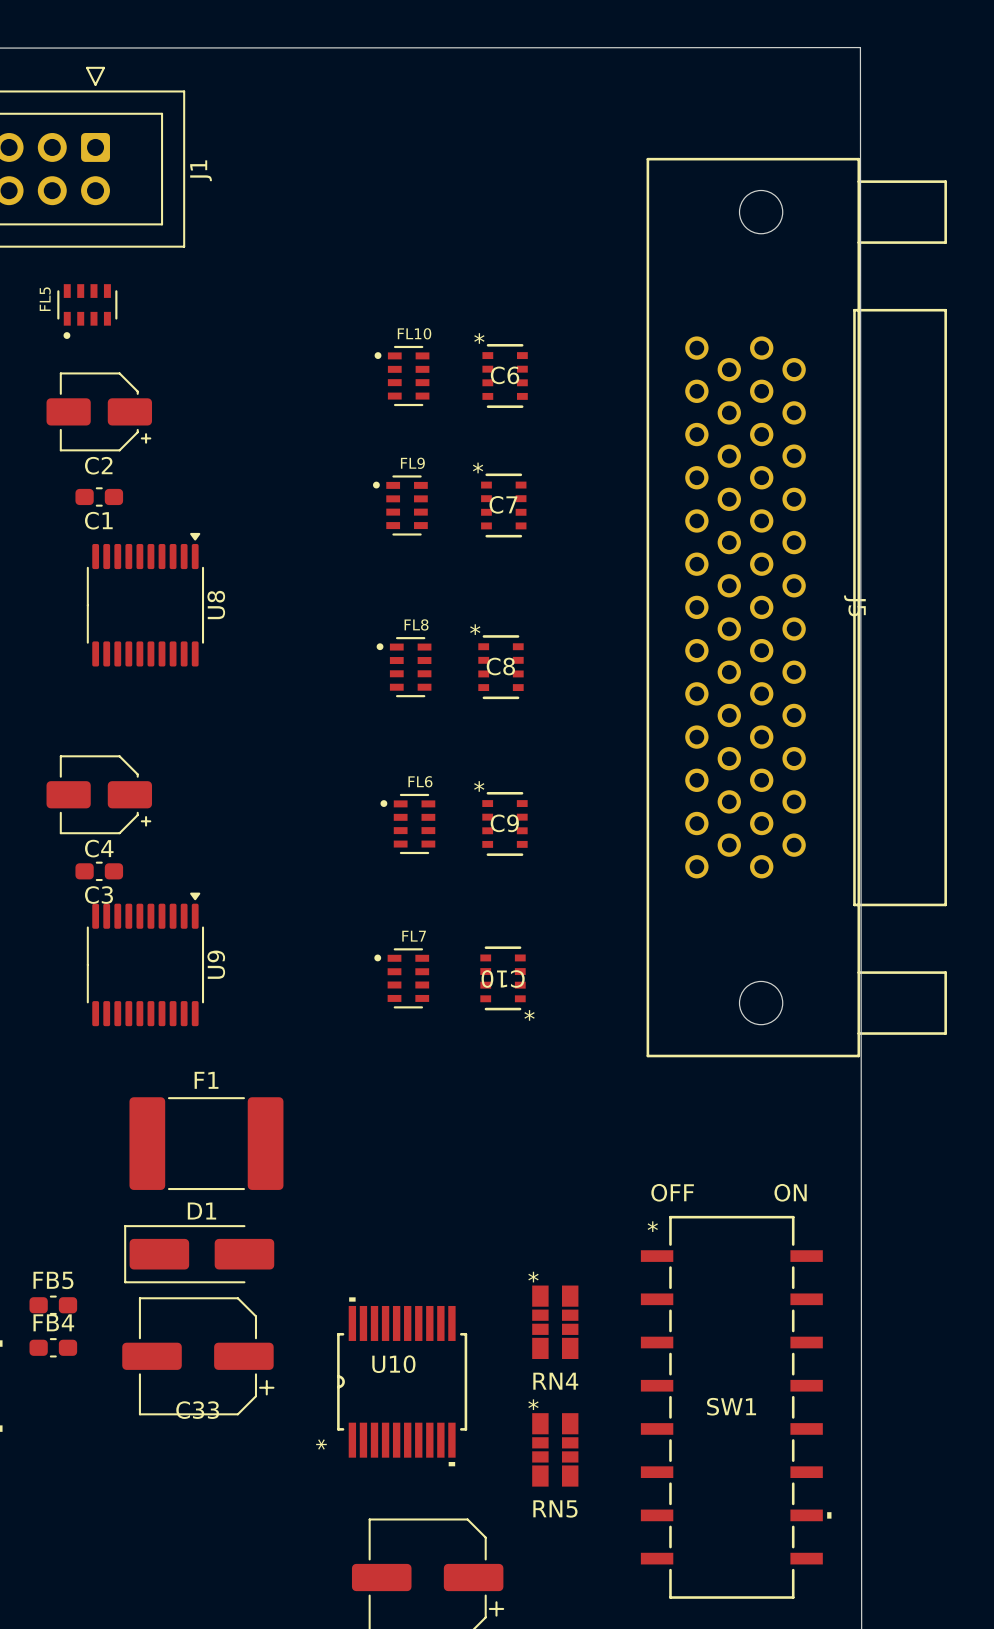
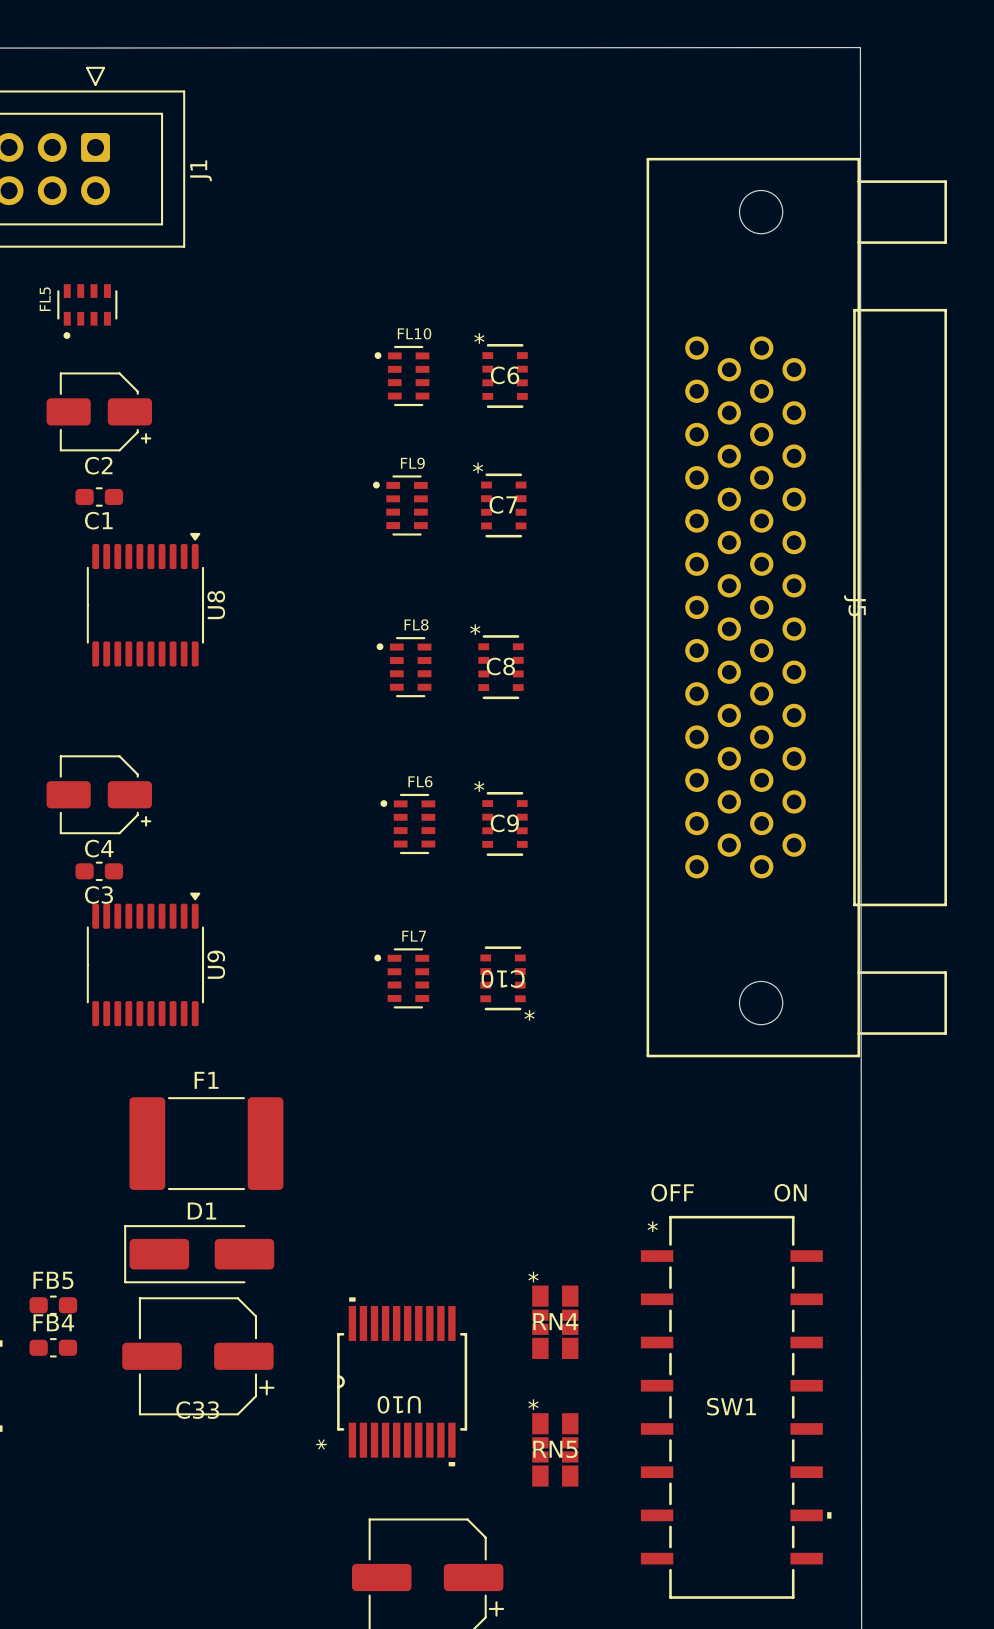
U10 name rotation: 0° (393, 1364) -> 180° (399, 1404)
RN4 name position: RN4 (555, 1381) -> RN4 (555, 1321)
RN5 name position: RN5 (555, 1508) -> RN5 (555, 1449)

